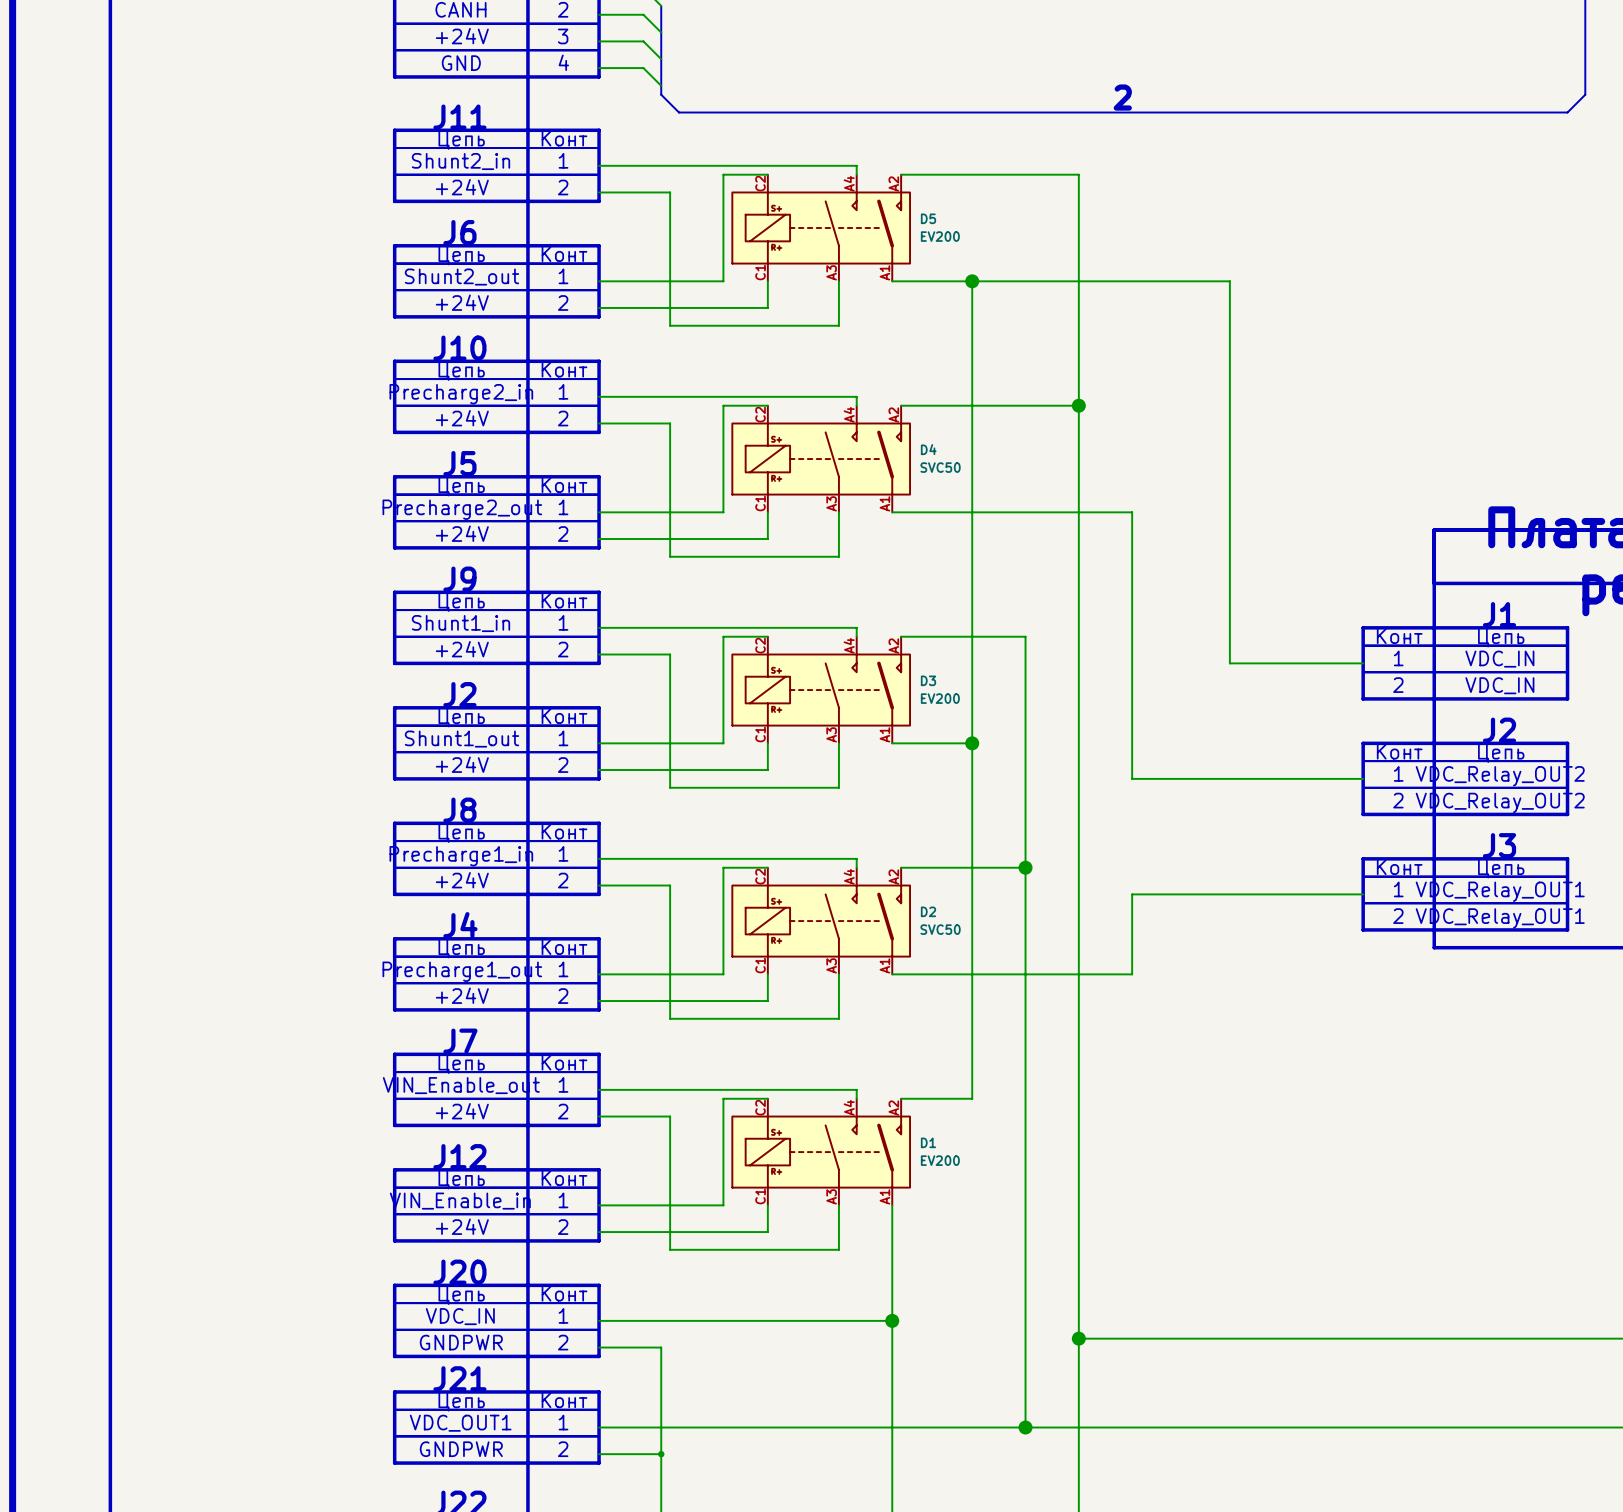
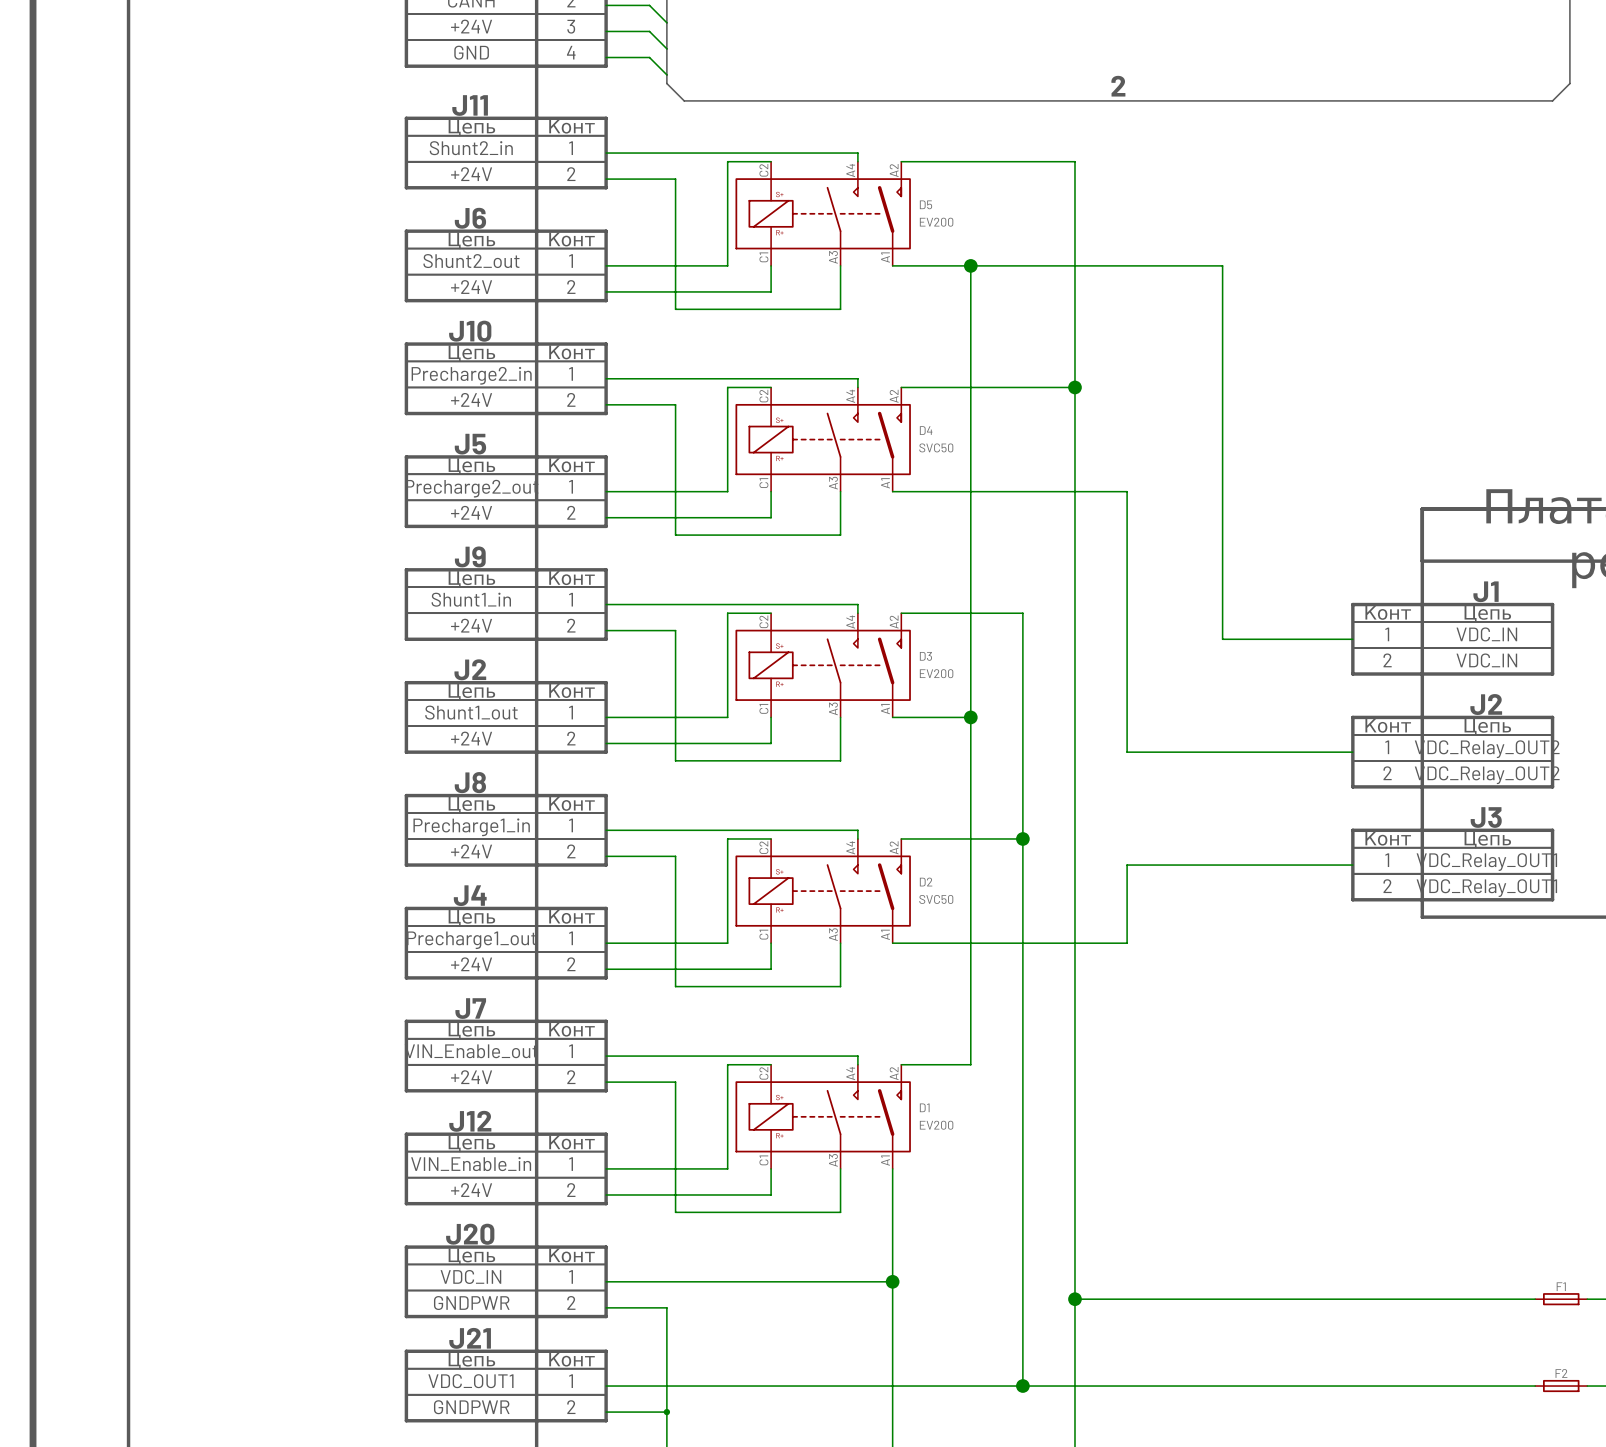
F1: none -> (1561, 1299)
F2: none -> (1561, 1386)

